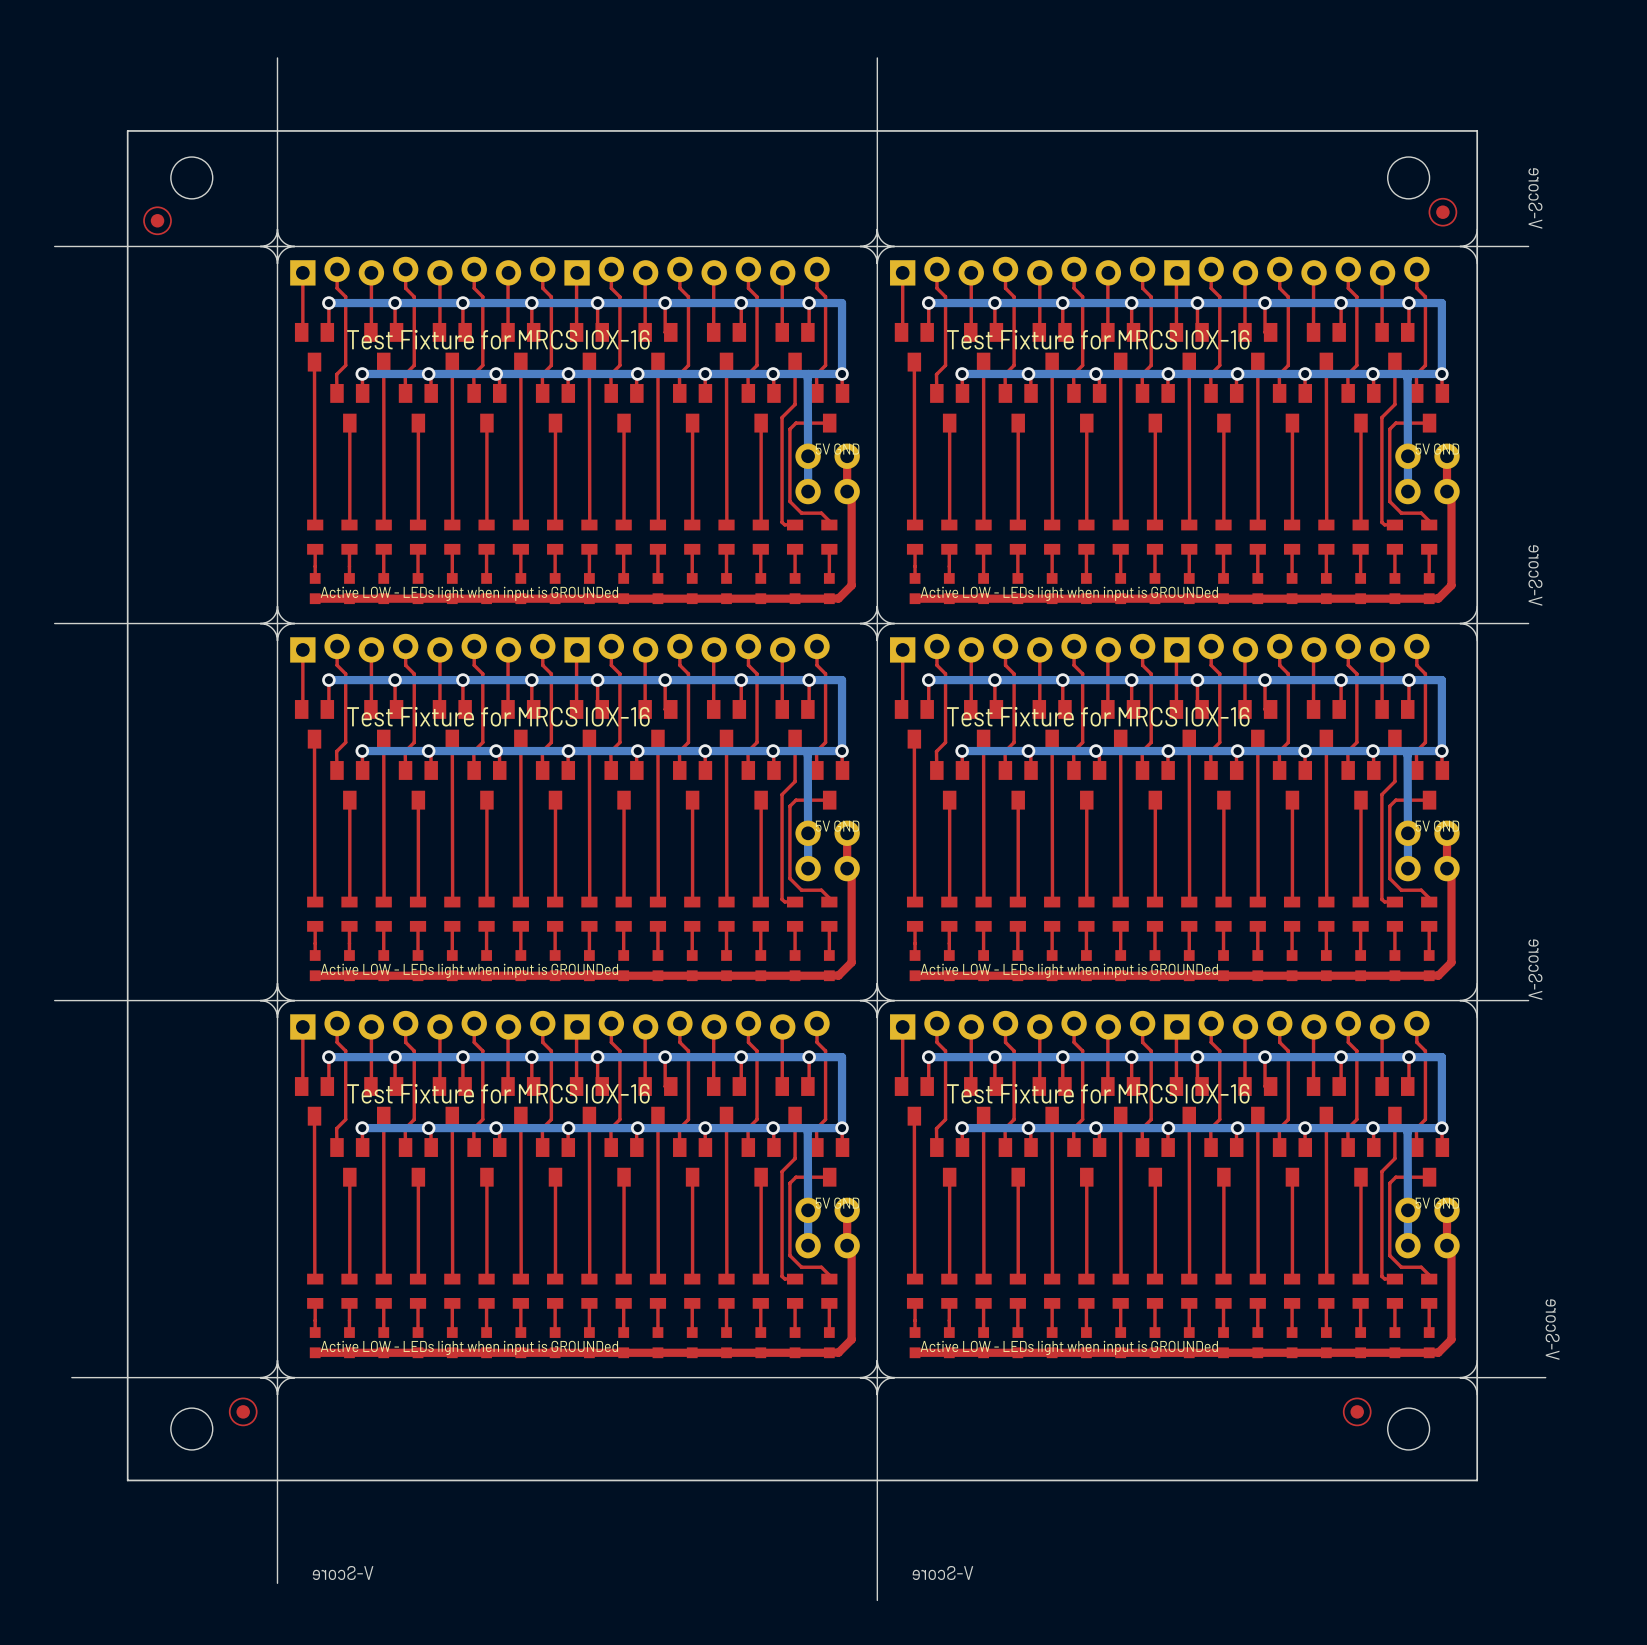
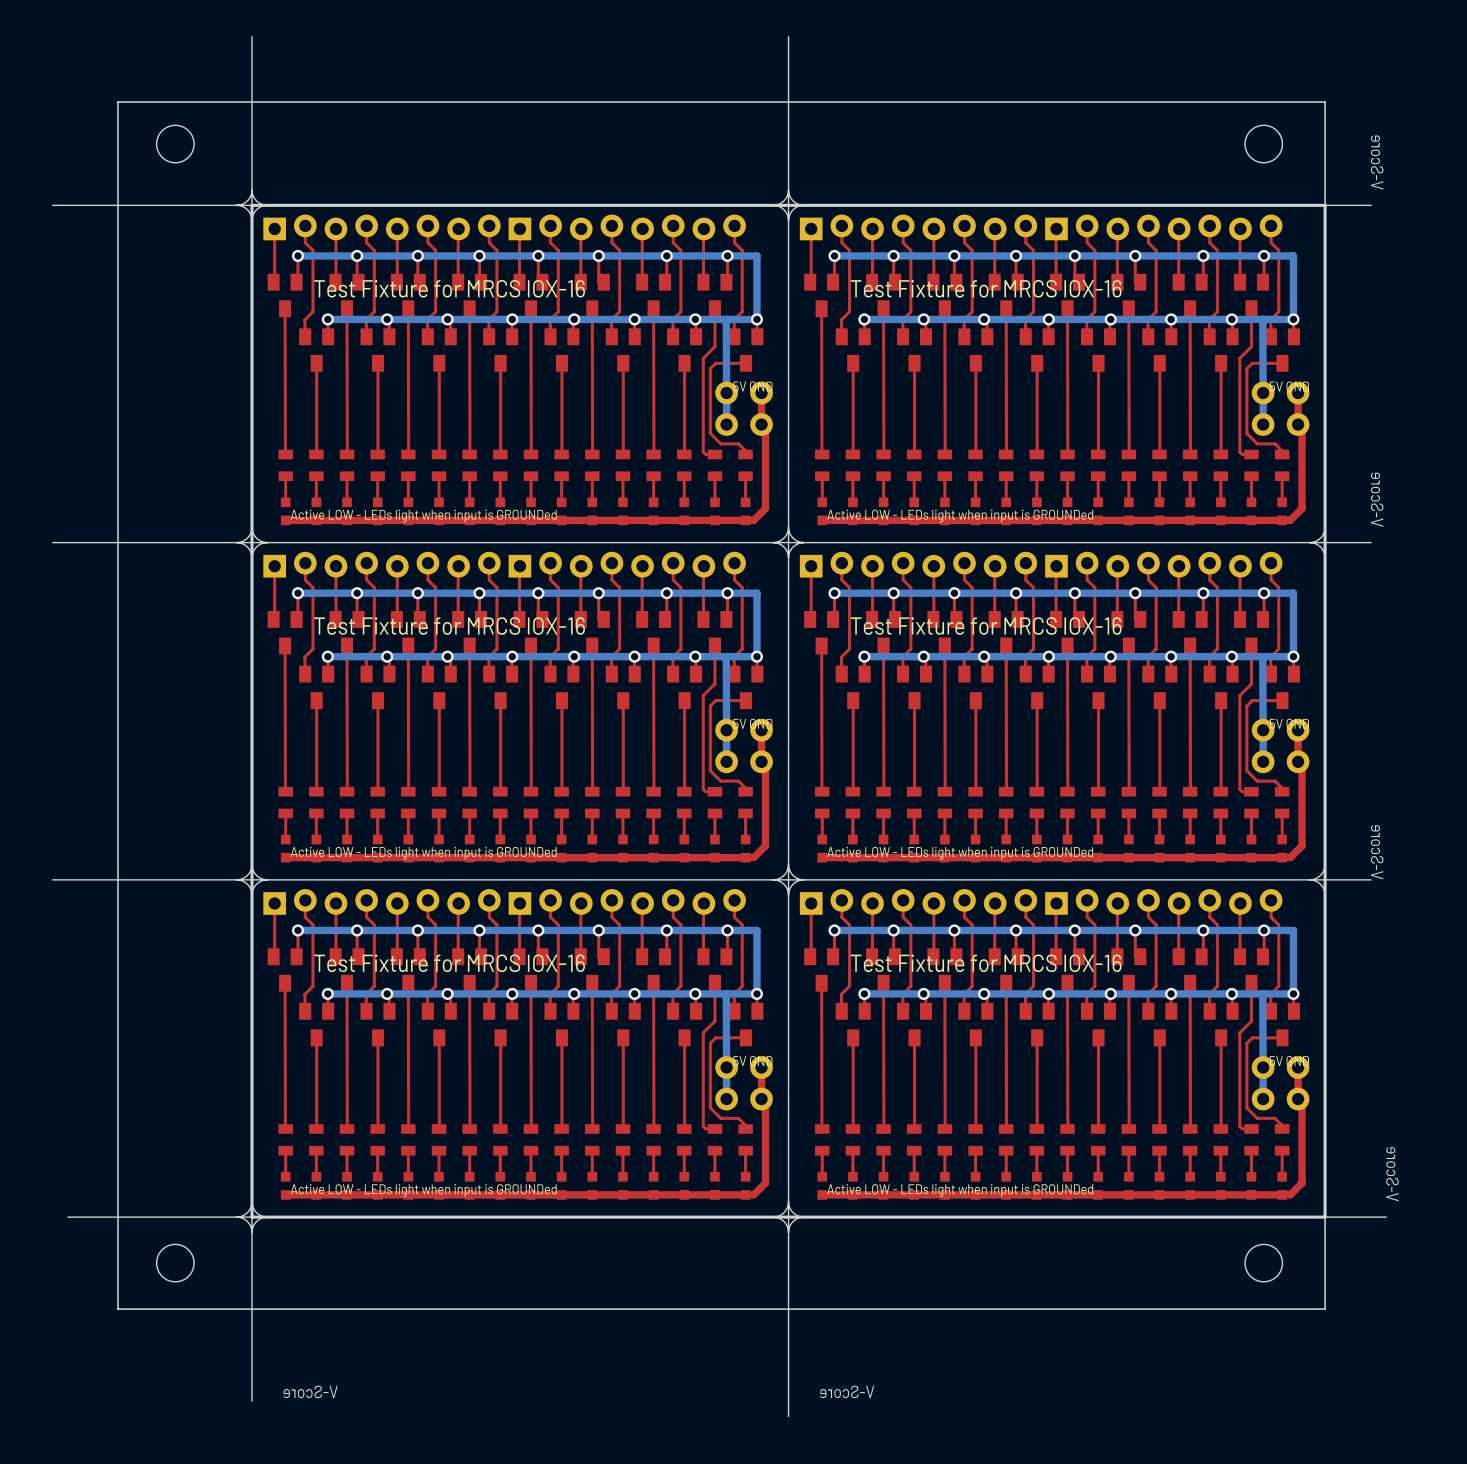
part: (1442, 212) -> none
part: (157, 220) -> none
board edge: (1477, 229) (1472, 241) (1460, 246) (1472, 251) (1477, 263) -> none
board edge: none -> (1325, 205) (1325, 1217) (251, 1217) (251, 205) (1325, 205)
board edge: (1477, 1360) (1472, 1372) (1460, 1377) (1472, 1382) (1477, 1394) -> none
part: (243, 1411) -> none
part: (1357, 1411) -> none

